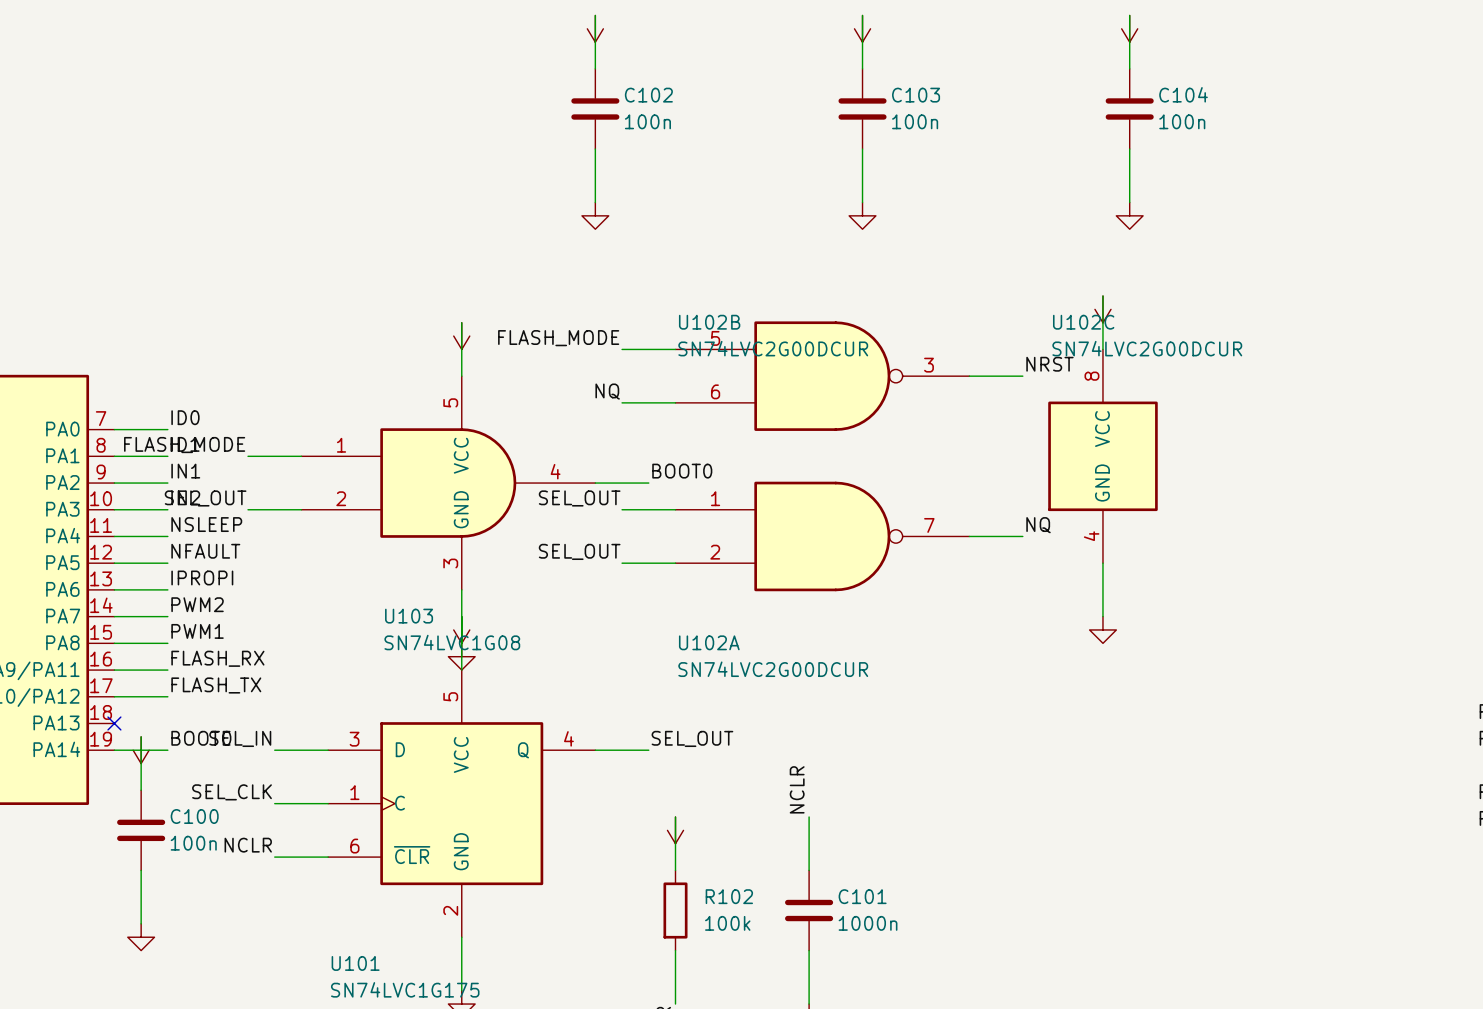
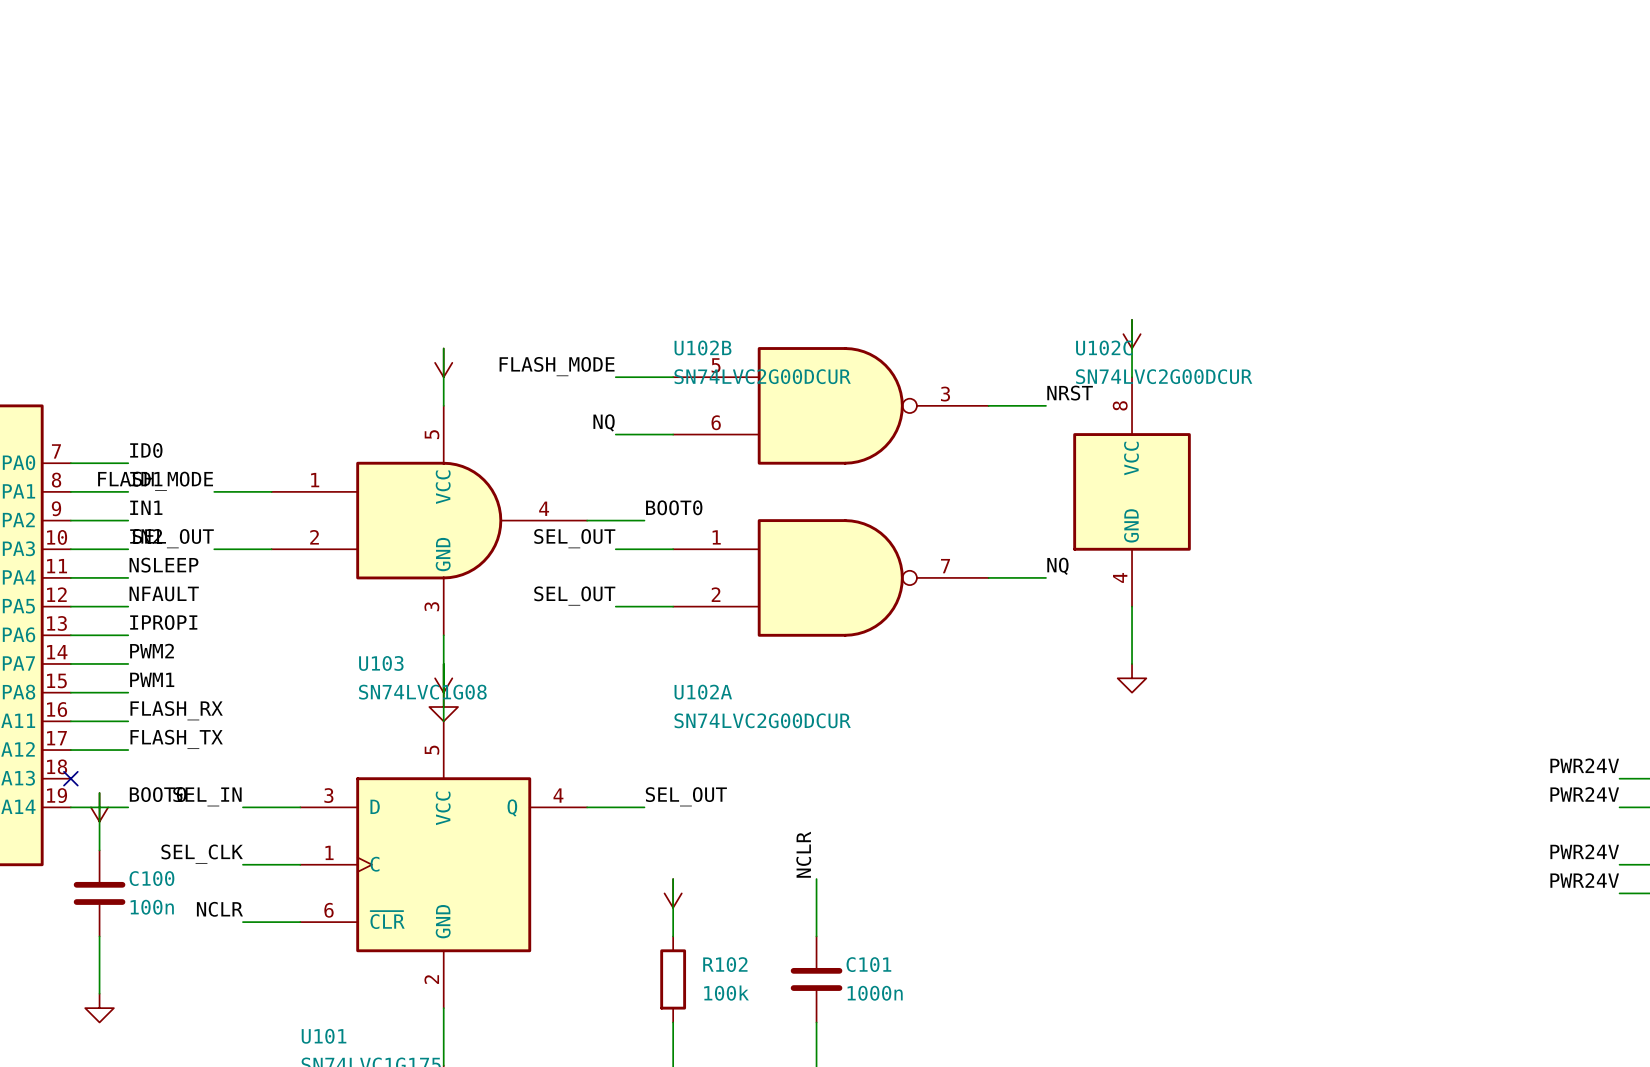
wire: (595, 15) (595, 68) -> none
wire: (862, 15) (862, 68) -> none
wire: (1129, 15) (1129, 68) -> none
power symbol: (595, 28) -> none
power symbol: (862, 28) -> none
power symbol: (1129, 28) -> none
C102: 100n (595, 108) -> none
C103: 100n (862, 108) -> none
C104: 100n (1129, 108) -> none
wire: (595, 149) (595, 202) -> none
wire: (862, 149) (862, 202) -> none
wire: (1129, 149) (1129, 202) -> none
power symbol: (595, 215) -> none
power symbol: (862, 215) -> none
power symbol: (1129, 215) -> none

